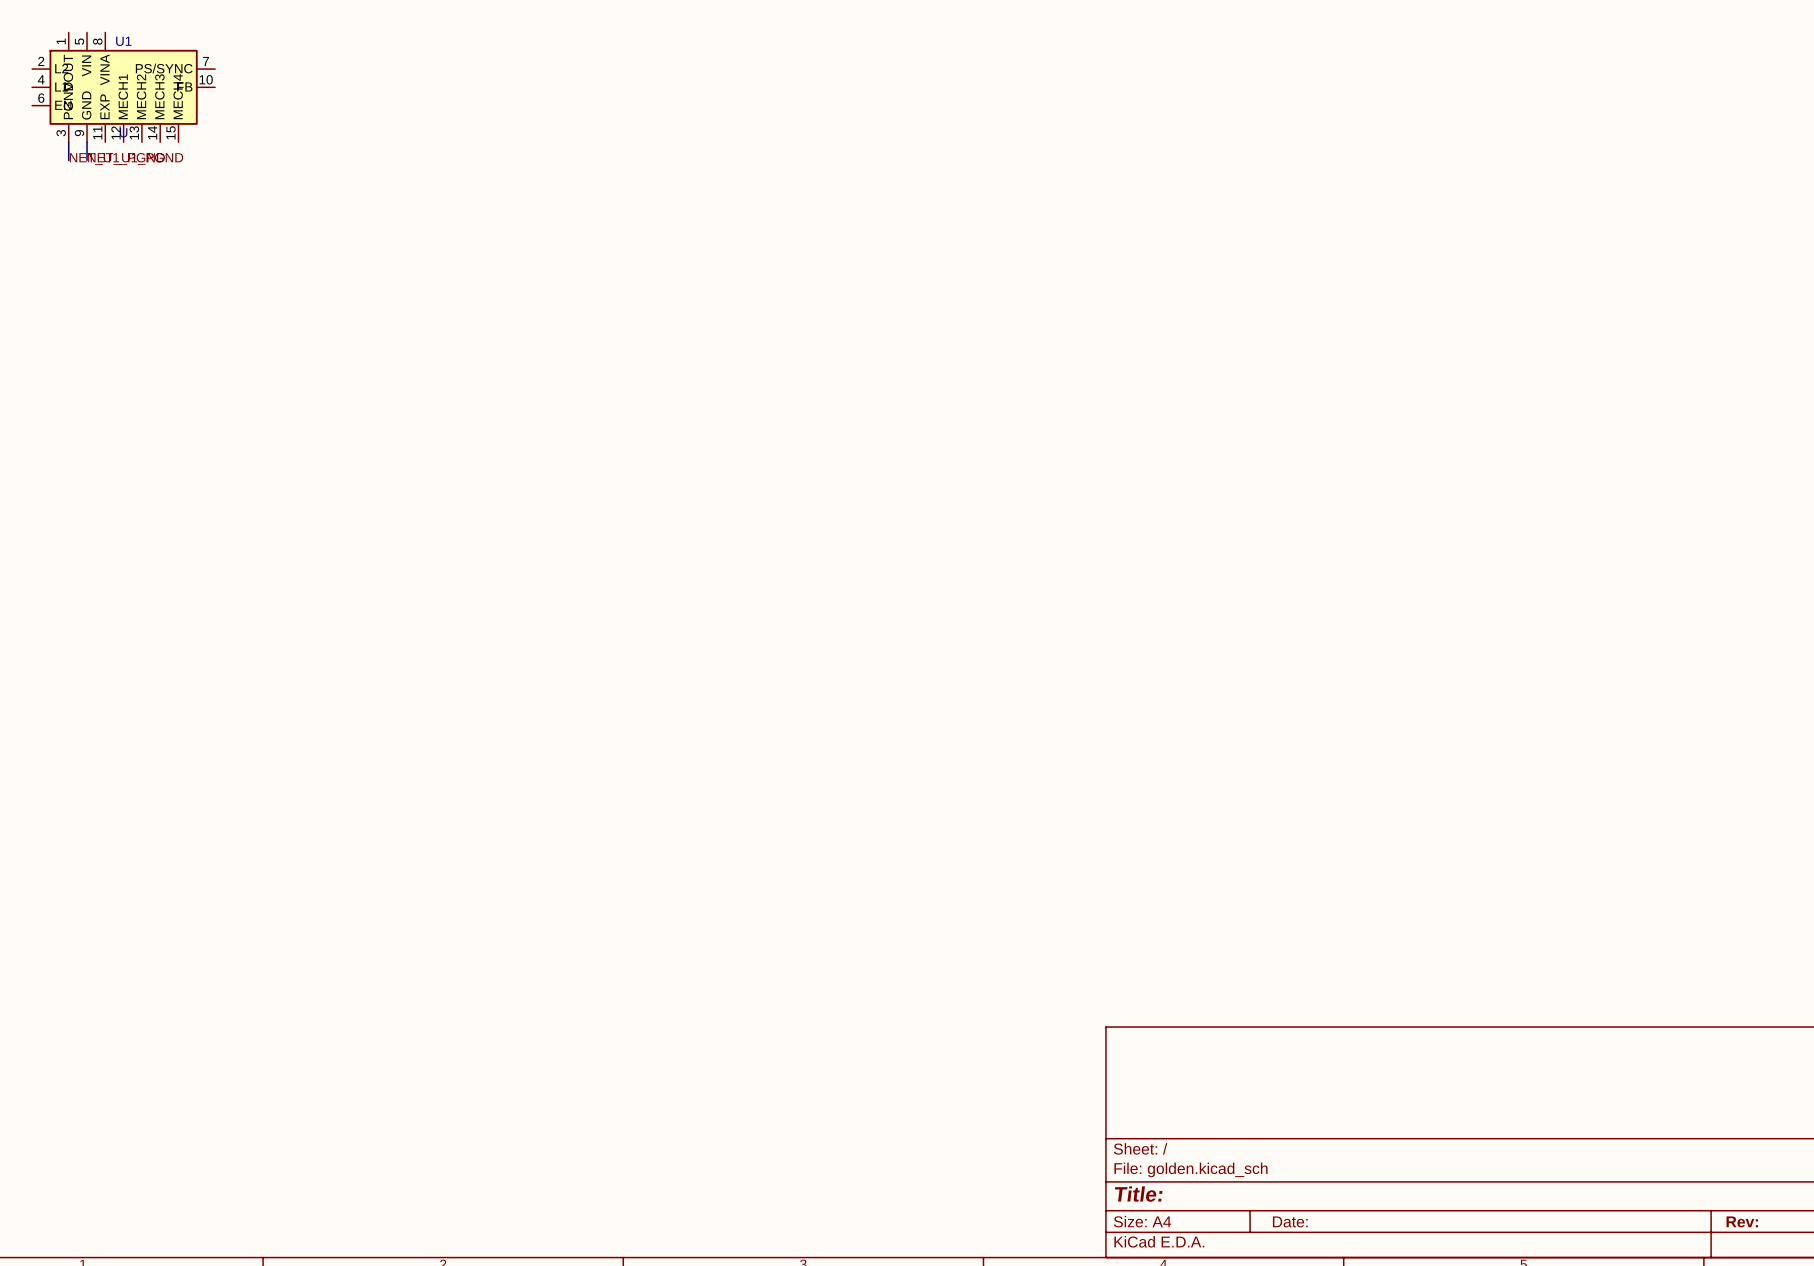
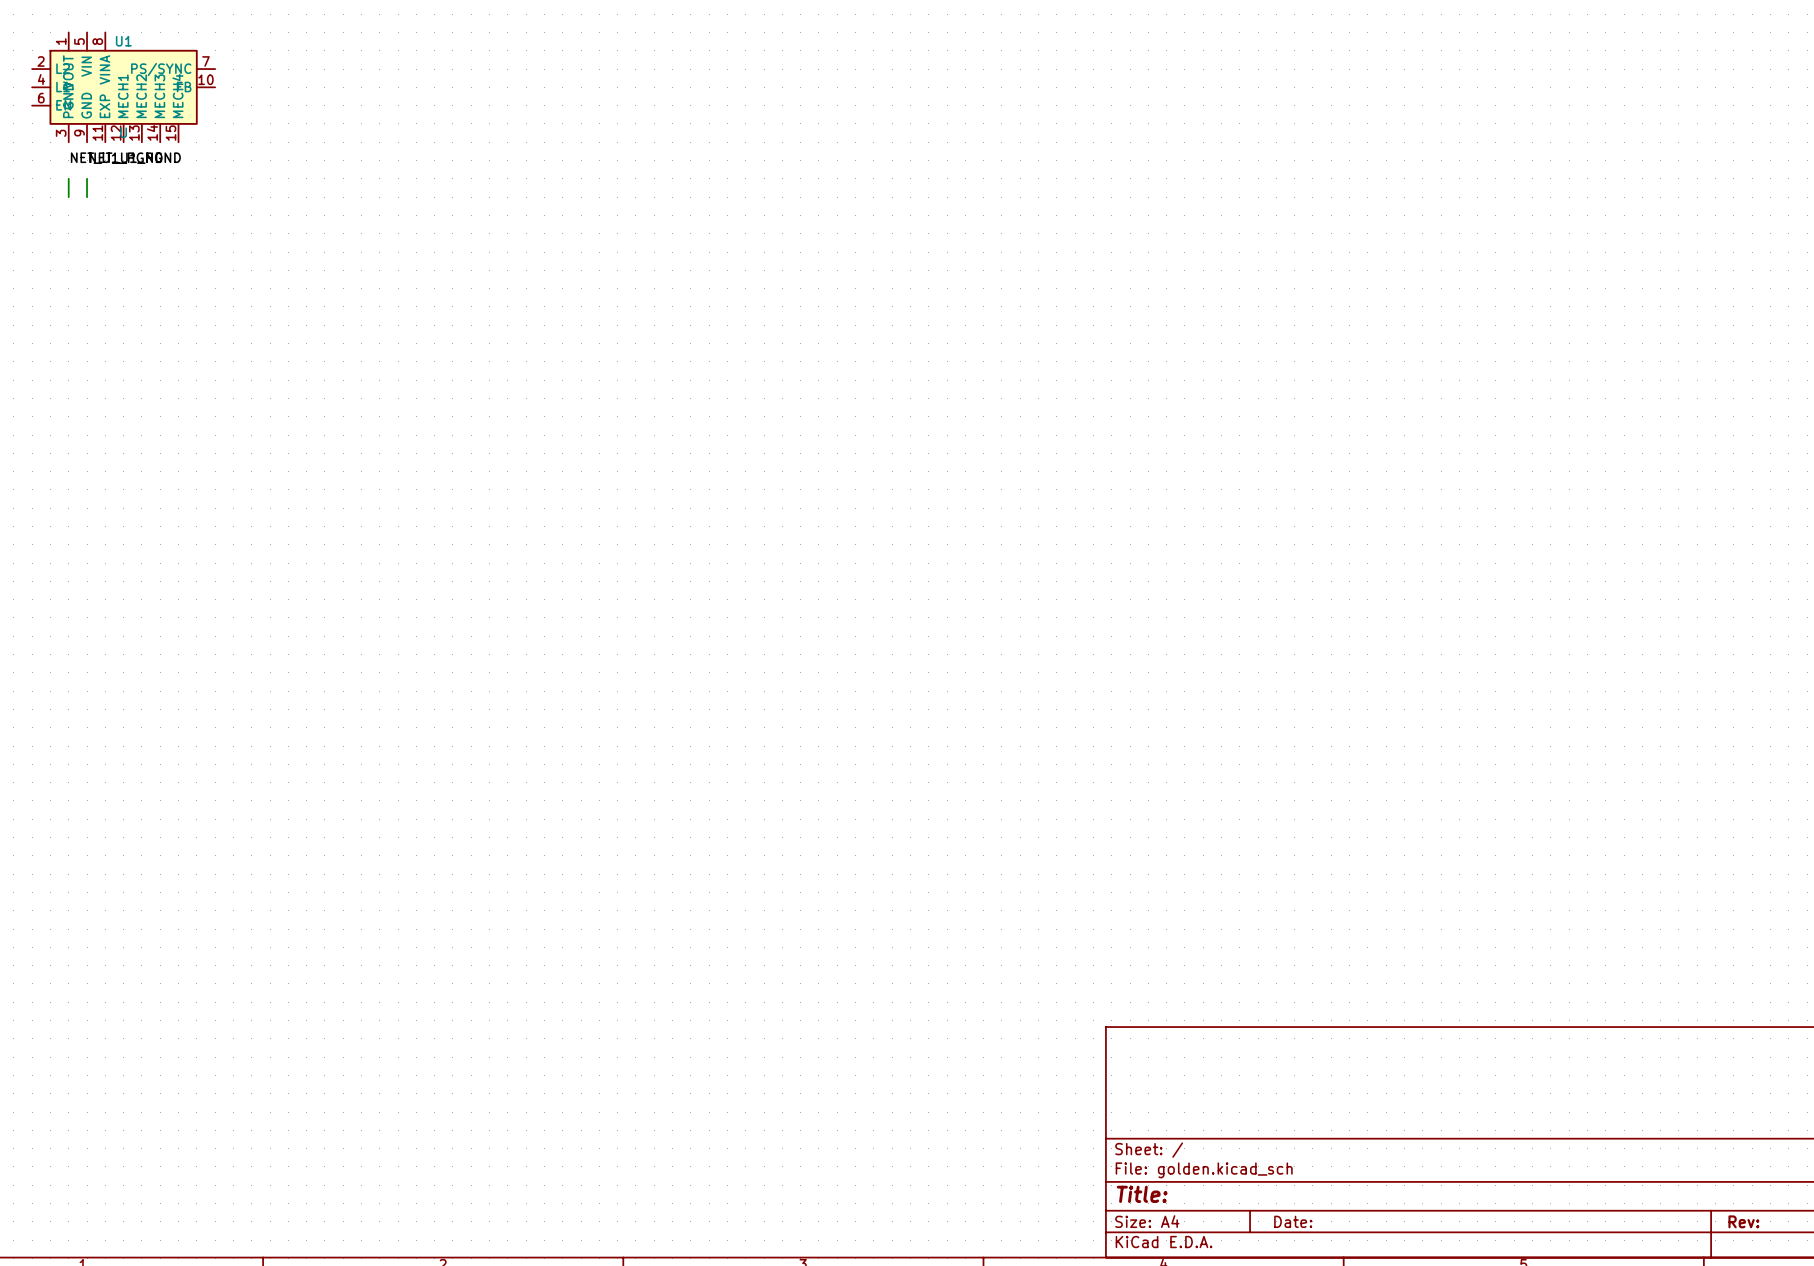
wire: (68, 142) (68, 160) -> (68, 178) (68, 197)
wire: (87, 142) (87, 160) -> (87, 178) (87, 197)

